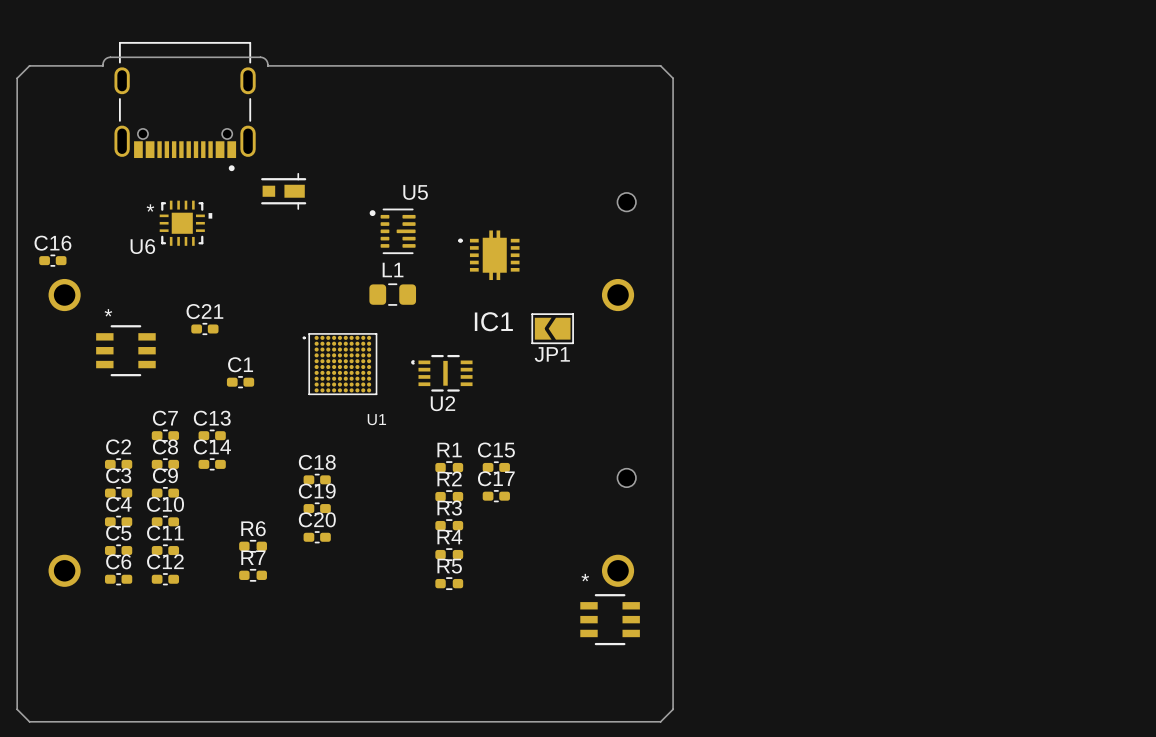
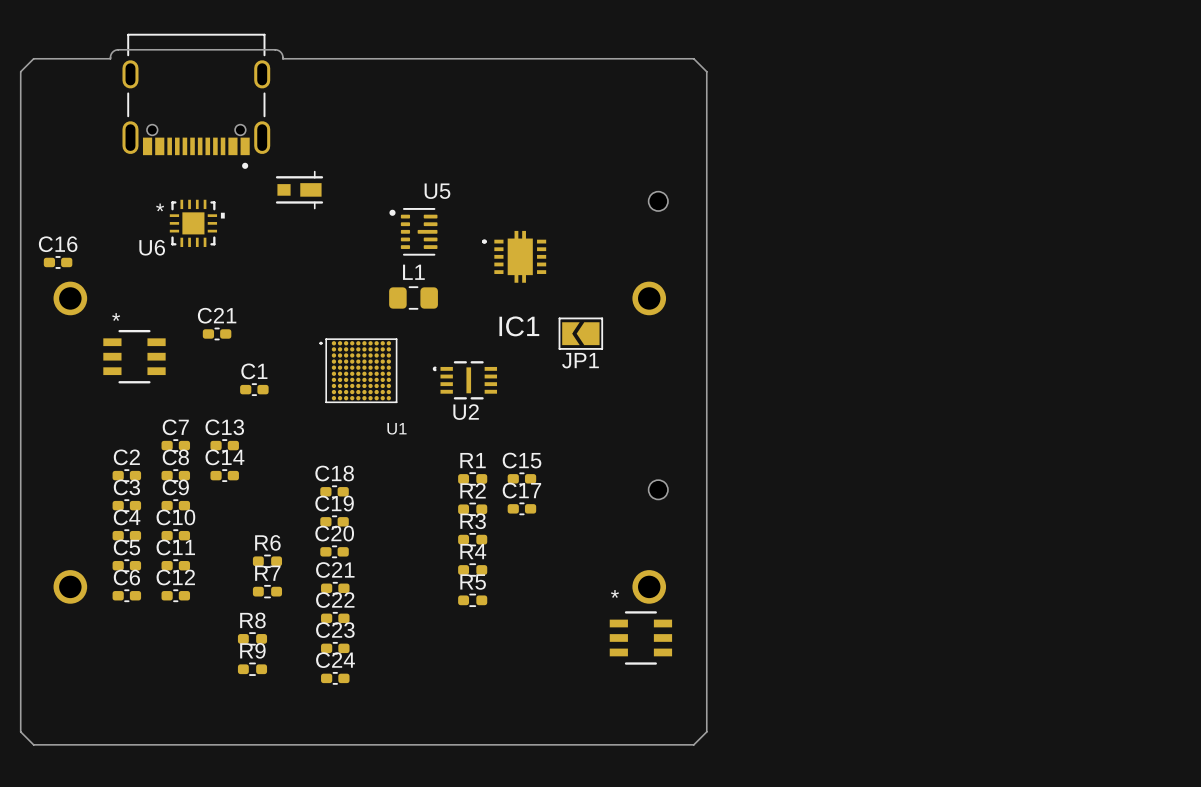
C21: none -> (335, 588)
C22: none -> (335, 618)
R8: none -> (252, 638)
C23: none -> (335, 648)
R9: none -> (252, 669)
C24: none -> (335, 678)

